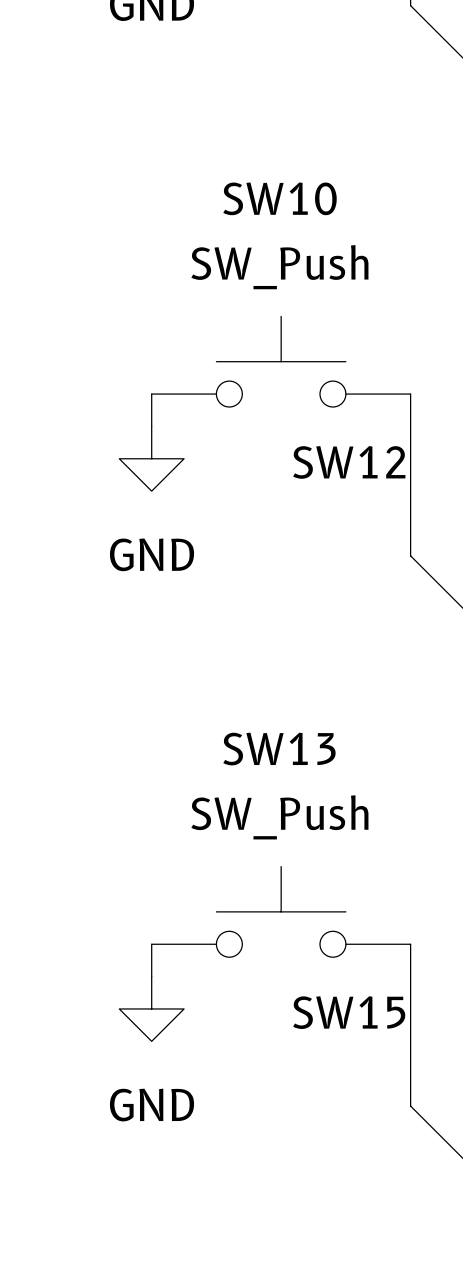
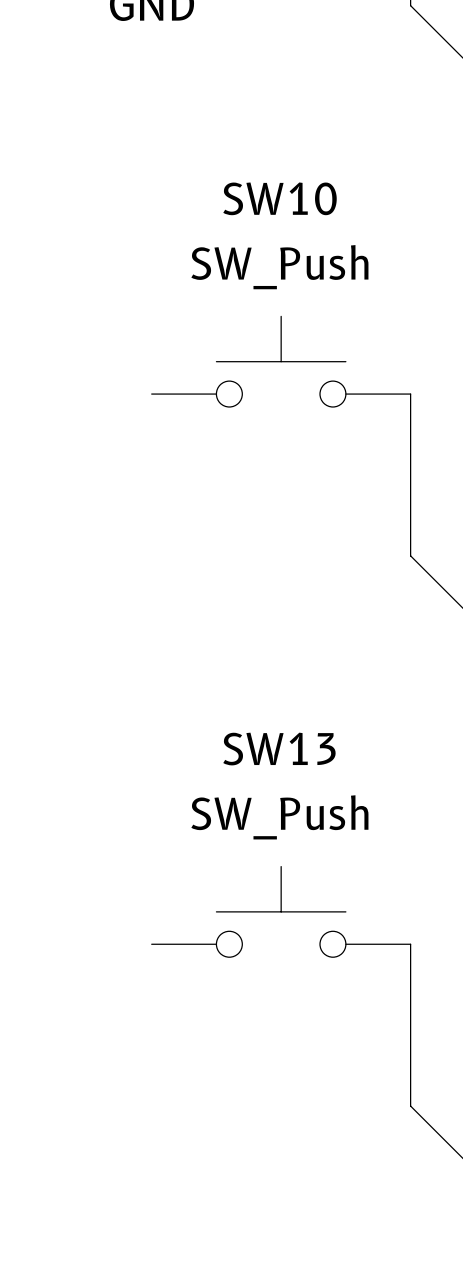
wire: (151, 394) (151, 426) -> none
power symbol: GND (151, 458) -> none
label: SW12 (349, 462) -> none
wire: (151, 944) (151, 976) -> none
power symbol: GND (151, 1008) -> none
label: SW15 (349, 1012) -> none

